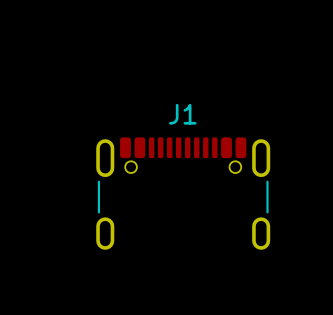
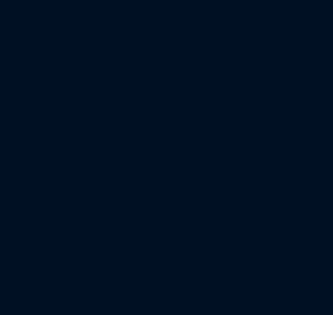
J1: (183, 193) -> none

